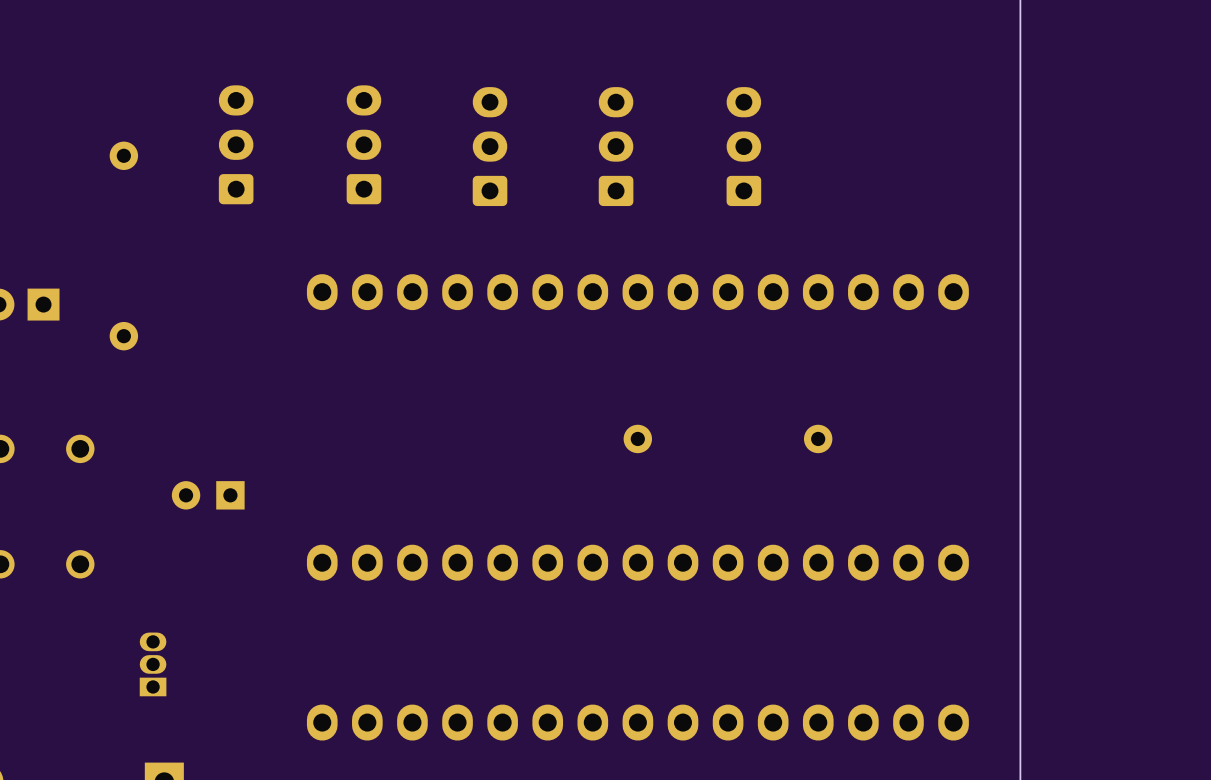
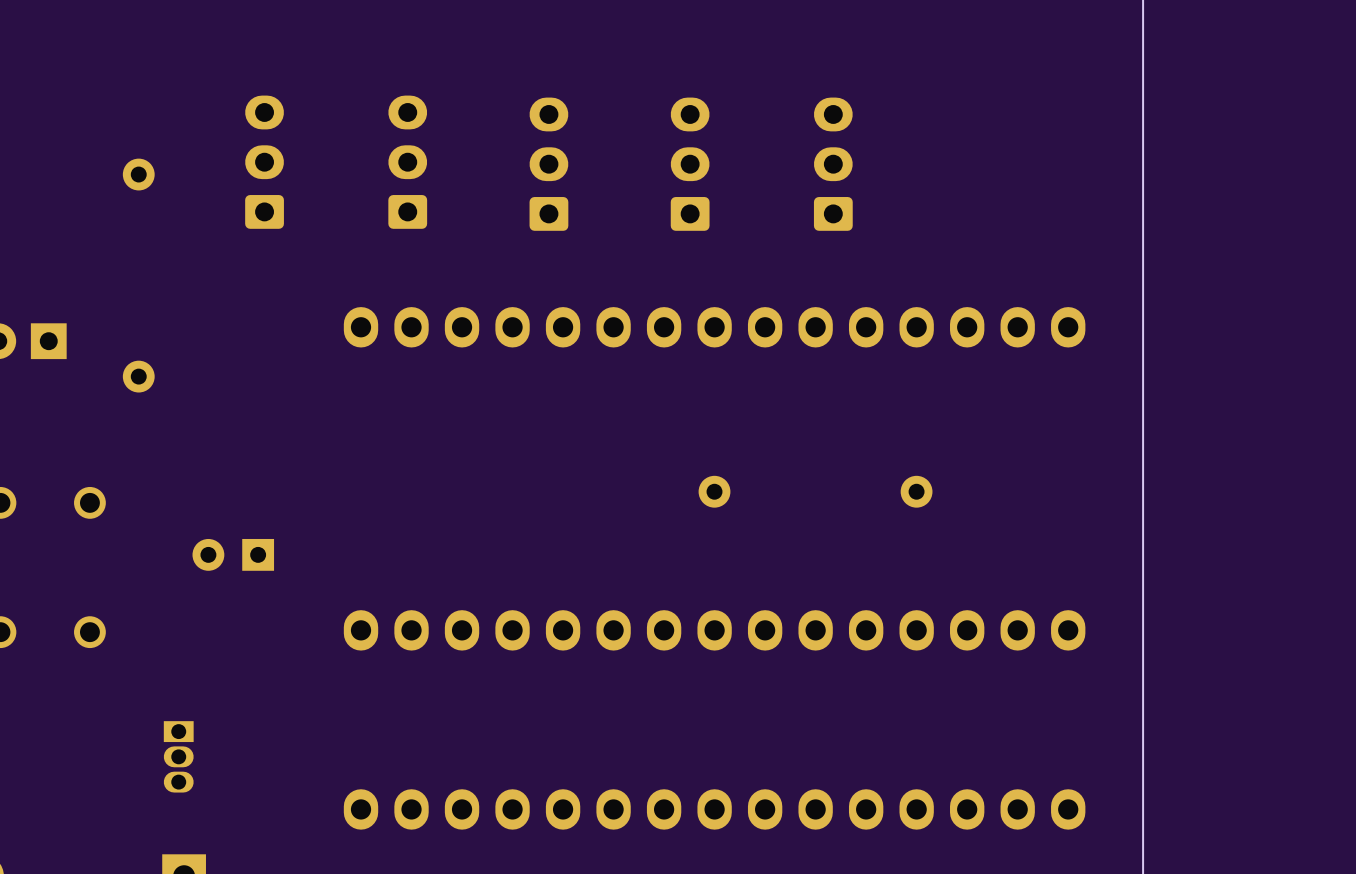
part rotation: 0° (153, 664) -> 180° (178, 756)

